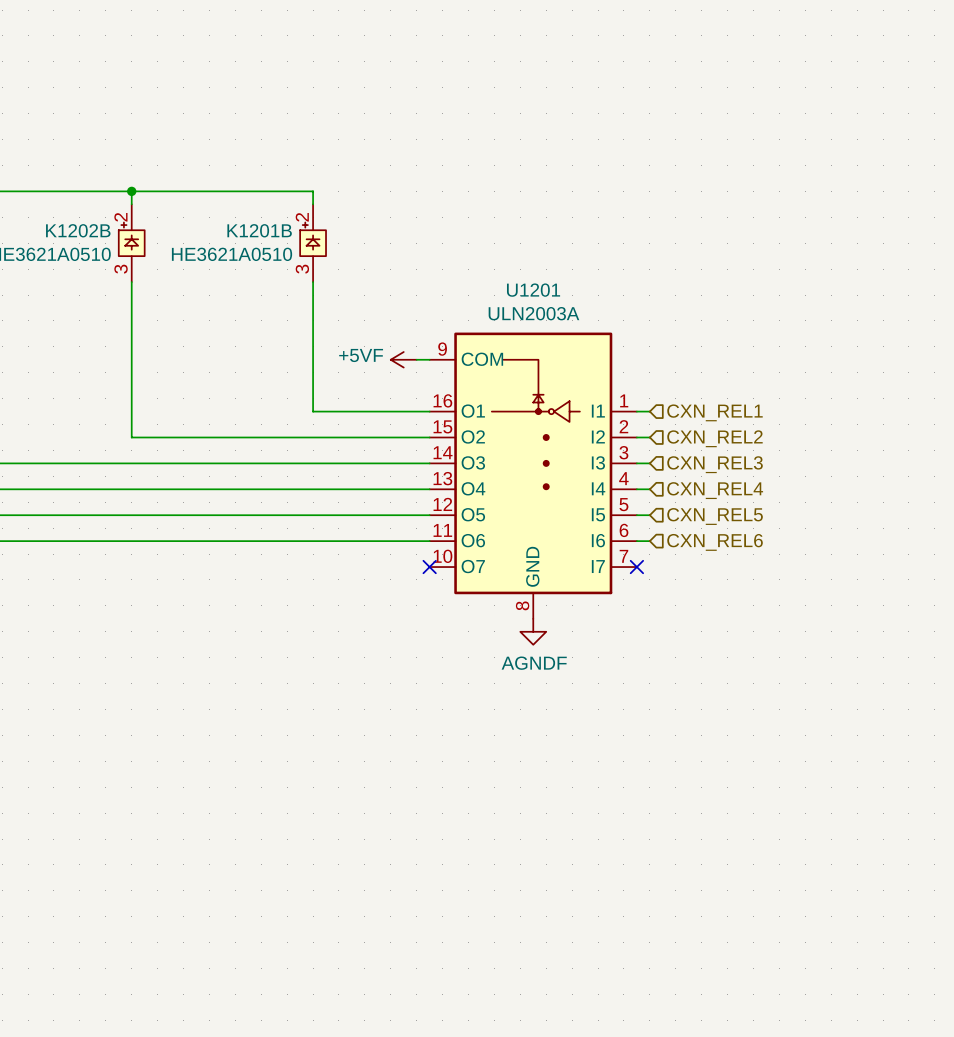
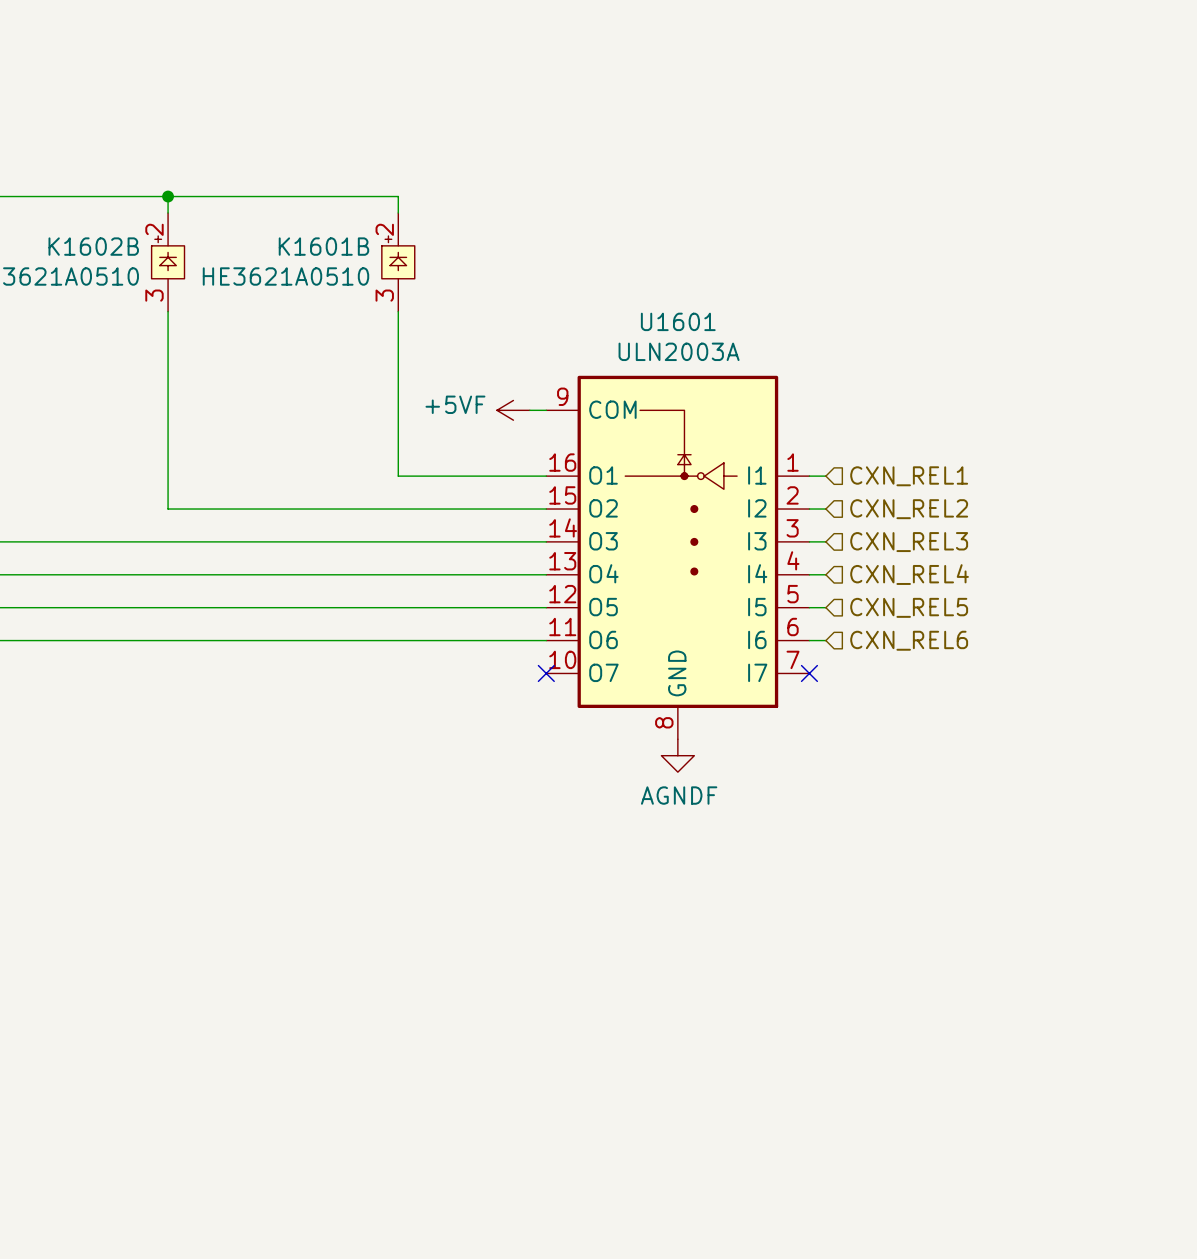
K1202B name: K1202B (78, 230) -> K1602B (93, 246)
K1201B name: K1201B (259, 230) -> K1601B (323, 246)
U1201 name: U1201 (533, 290) -> U1601 (678, 321)

